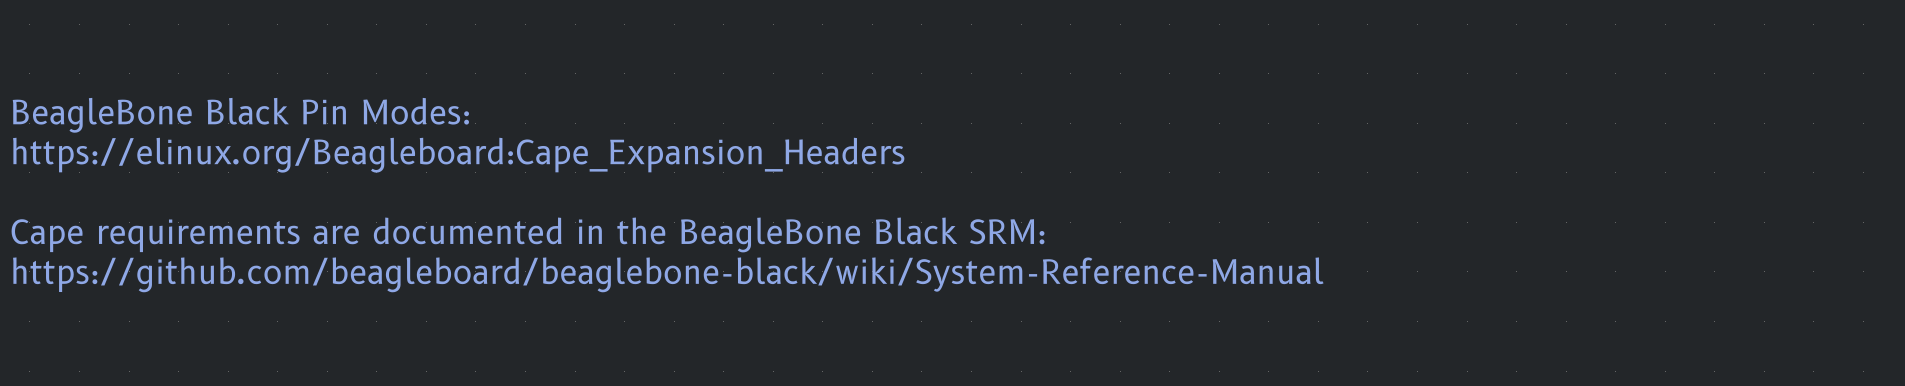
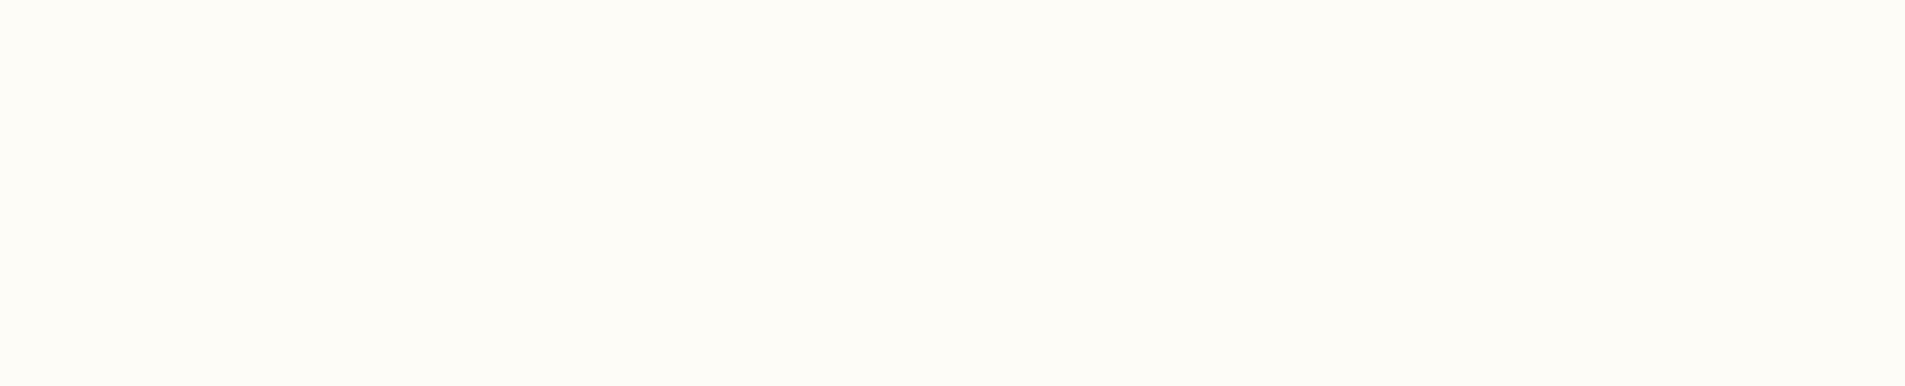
text: BeagleBone Black Pin Modes: (240, 115) -> none
text: https://elinux.org/Beagleboard:Cape_Expansion_Headers (458, 155) -> none
text: Cape requirements are documented in the BeagleBone Black SRM: (528, 234) -> none
text: https://github.com/beagleboard/beaglebone-black/wiki/System-Reference-Manual (668, 274) -> none

